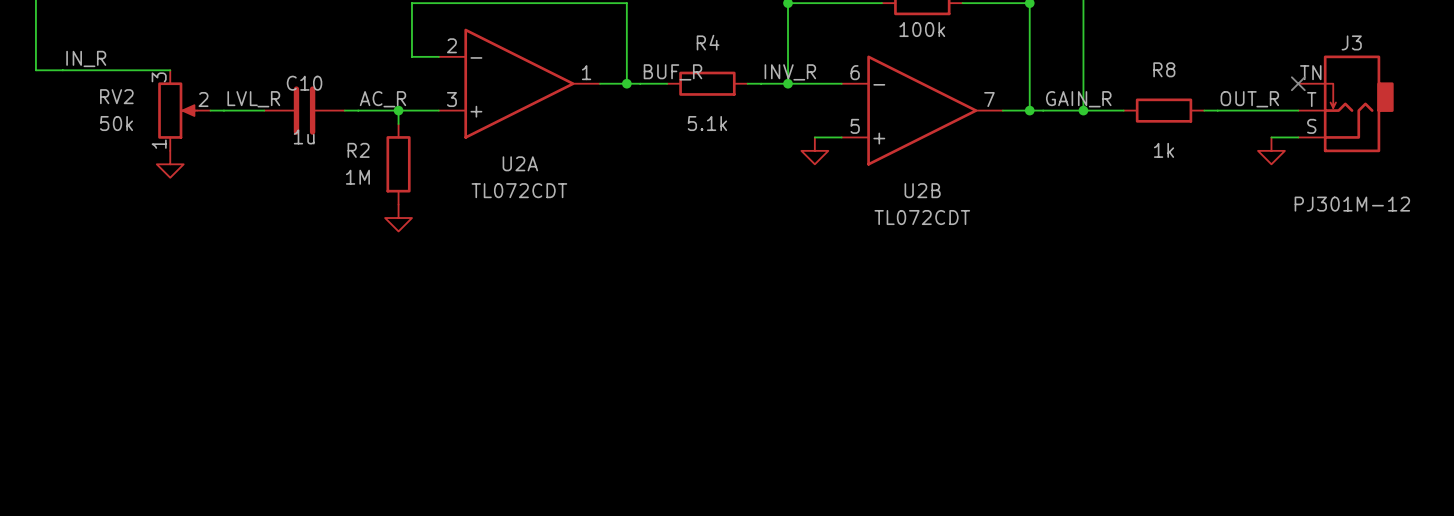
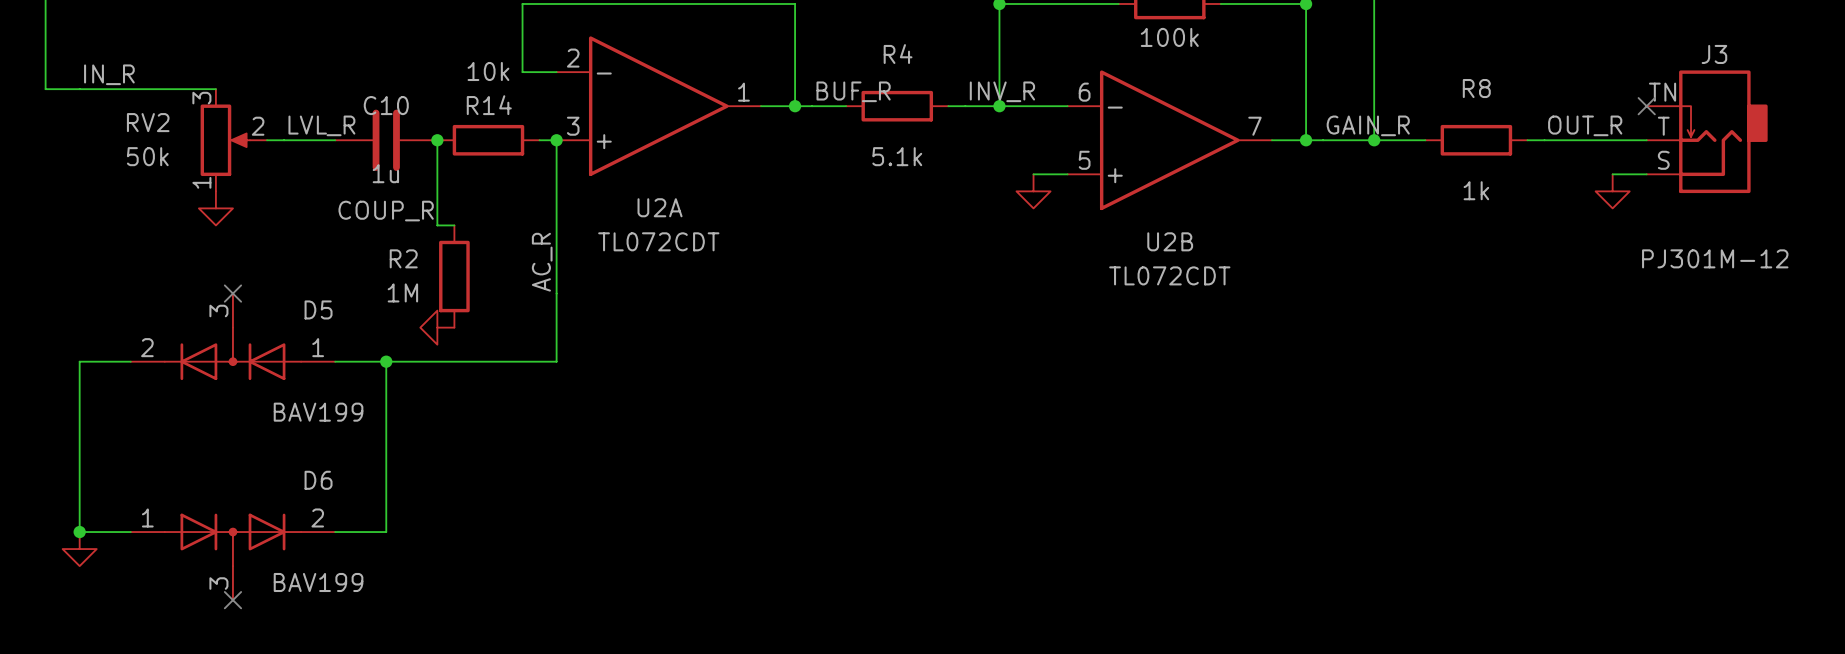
label rotation: 0° (382, 99) -> 90° counterclockwise (542, 262)
label position: AC_R (382, 99) -> AC_R (542, 262)
wire: (344, 110) (425, 110) -> (437, 140) (437, 225) (454, 225)
junction: none -> (437, 140)
R14: none -> 10k (488, 140)
wire: (398, 110) (398, 124) -> none
junction: (398, 110) -> none
wire: none -> (556, 140) (556, 361) (335, 361)
junction: none -> (556, 140)
R2 position: (398, 164) -> (454, 276)
label: none -> COUP_R (386, 211)
power symbol rotation: 0° (398, 218) -> 90° clockwise (437, 327)
power symbol position: (398, 218) -> (437, 327)
no-connect mark: none -> (232, 293)
D5: none -> BAV199 (232, 336)
wire: none -> (130, 361) (79, 361) (79, 532) (130, 532)
wire: none -> (386, 361) (386, 532) (335, 532)
junction: none -> (386, 361)
junction: none -> (79, 532)
power symbol: none -> (79, 549)
D6: none -> BAV199 (232, 556)
no-connect mark: none -> (232, 600)

